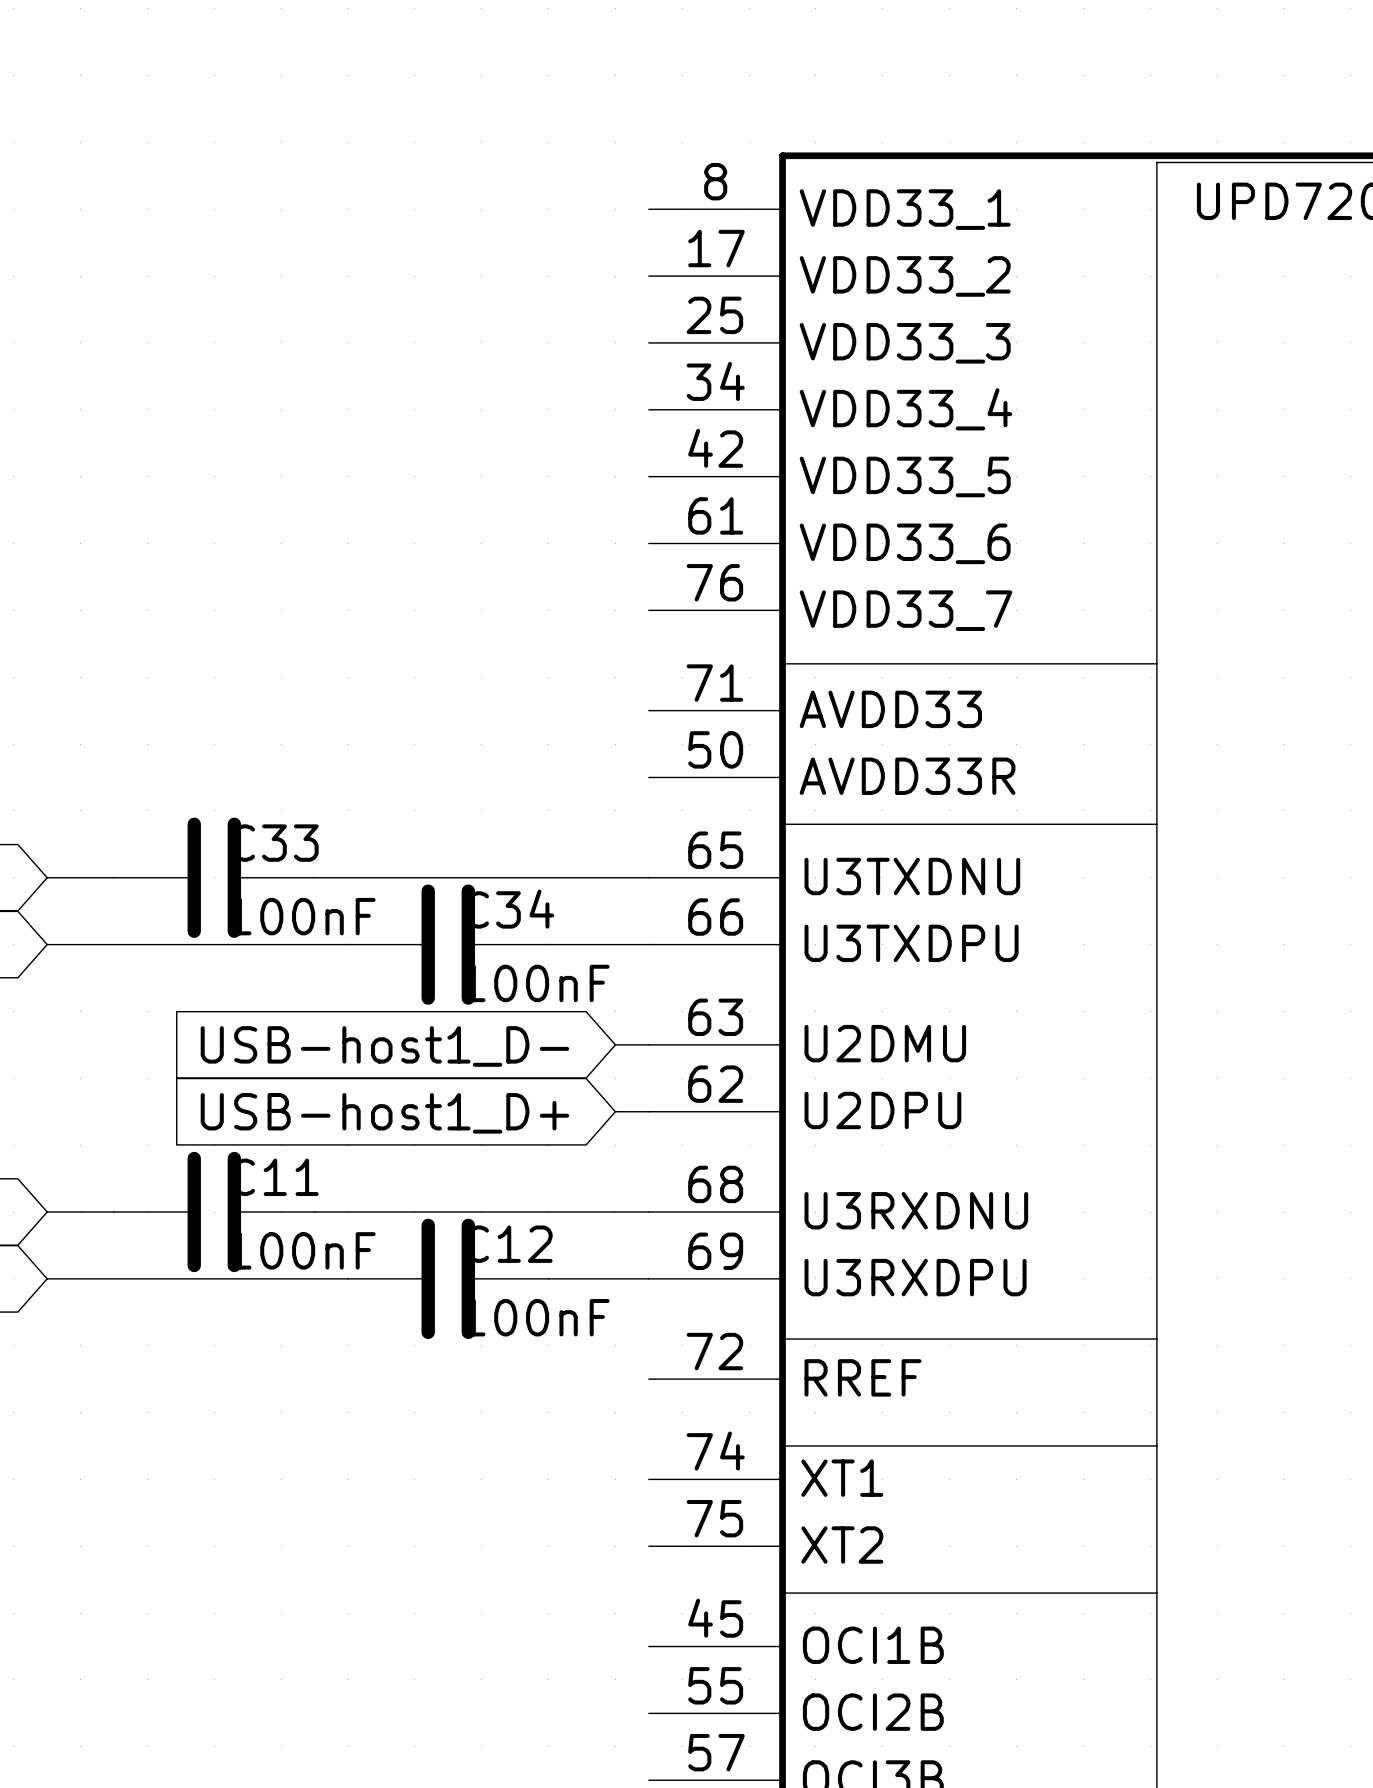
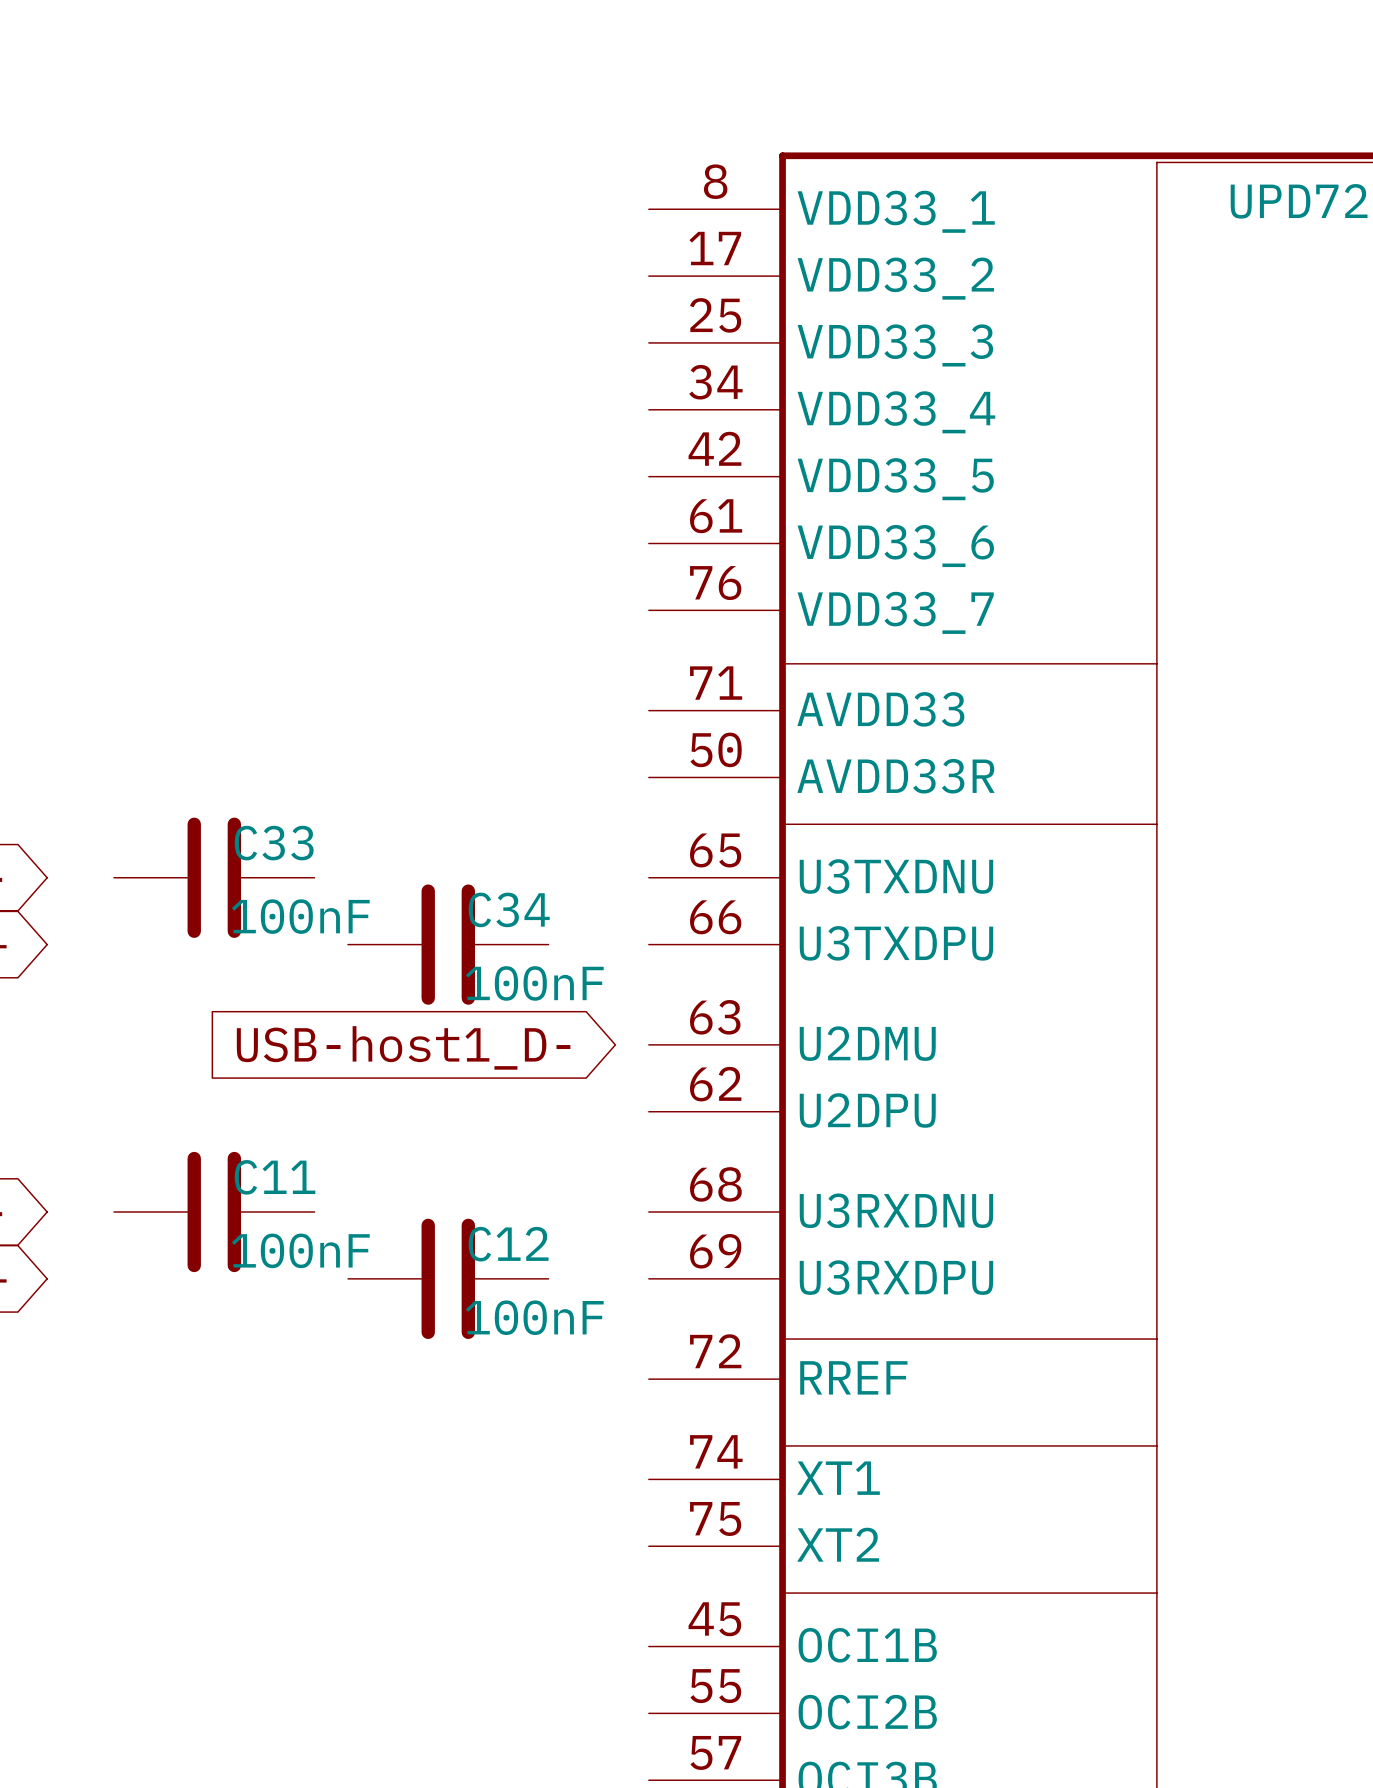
wire: (47, 877) (114, 877) -> none
wire: (314, 877) (648, 877) -> none
wire: (47, 944) (348, 944) -> none
wire: (548, 944) (648, 944) -> none
wire: (615, 1044) (648, 1044) -> none
wire: (615, 1111) (648, 1111) -> none
global label: USB-host1_D+ (384, 1113) -> none
wire: (47, 1212) (114, 1212) -> none
wire: (314, 1212) (648, 1212) -> none
wire: (47, 1278) (348, 1278) -> none
wire: (548, 1278) (648, 1278) -> none

